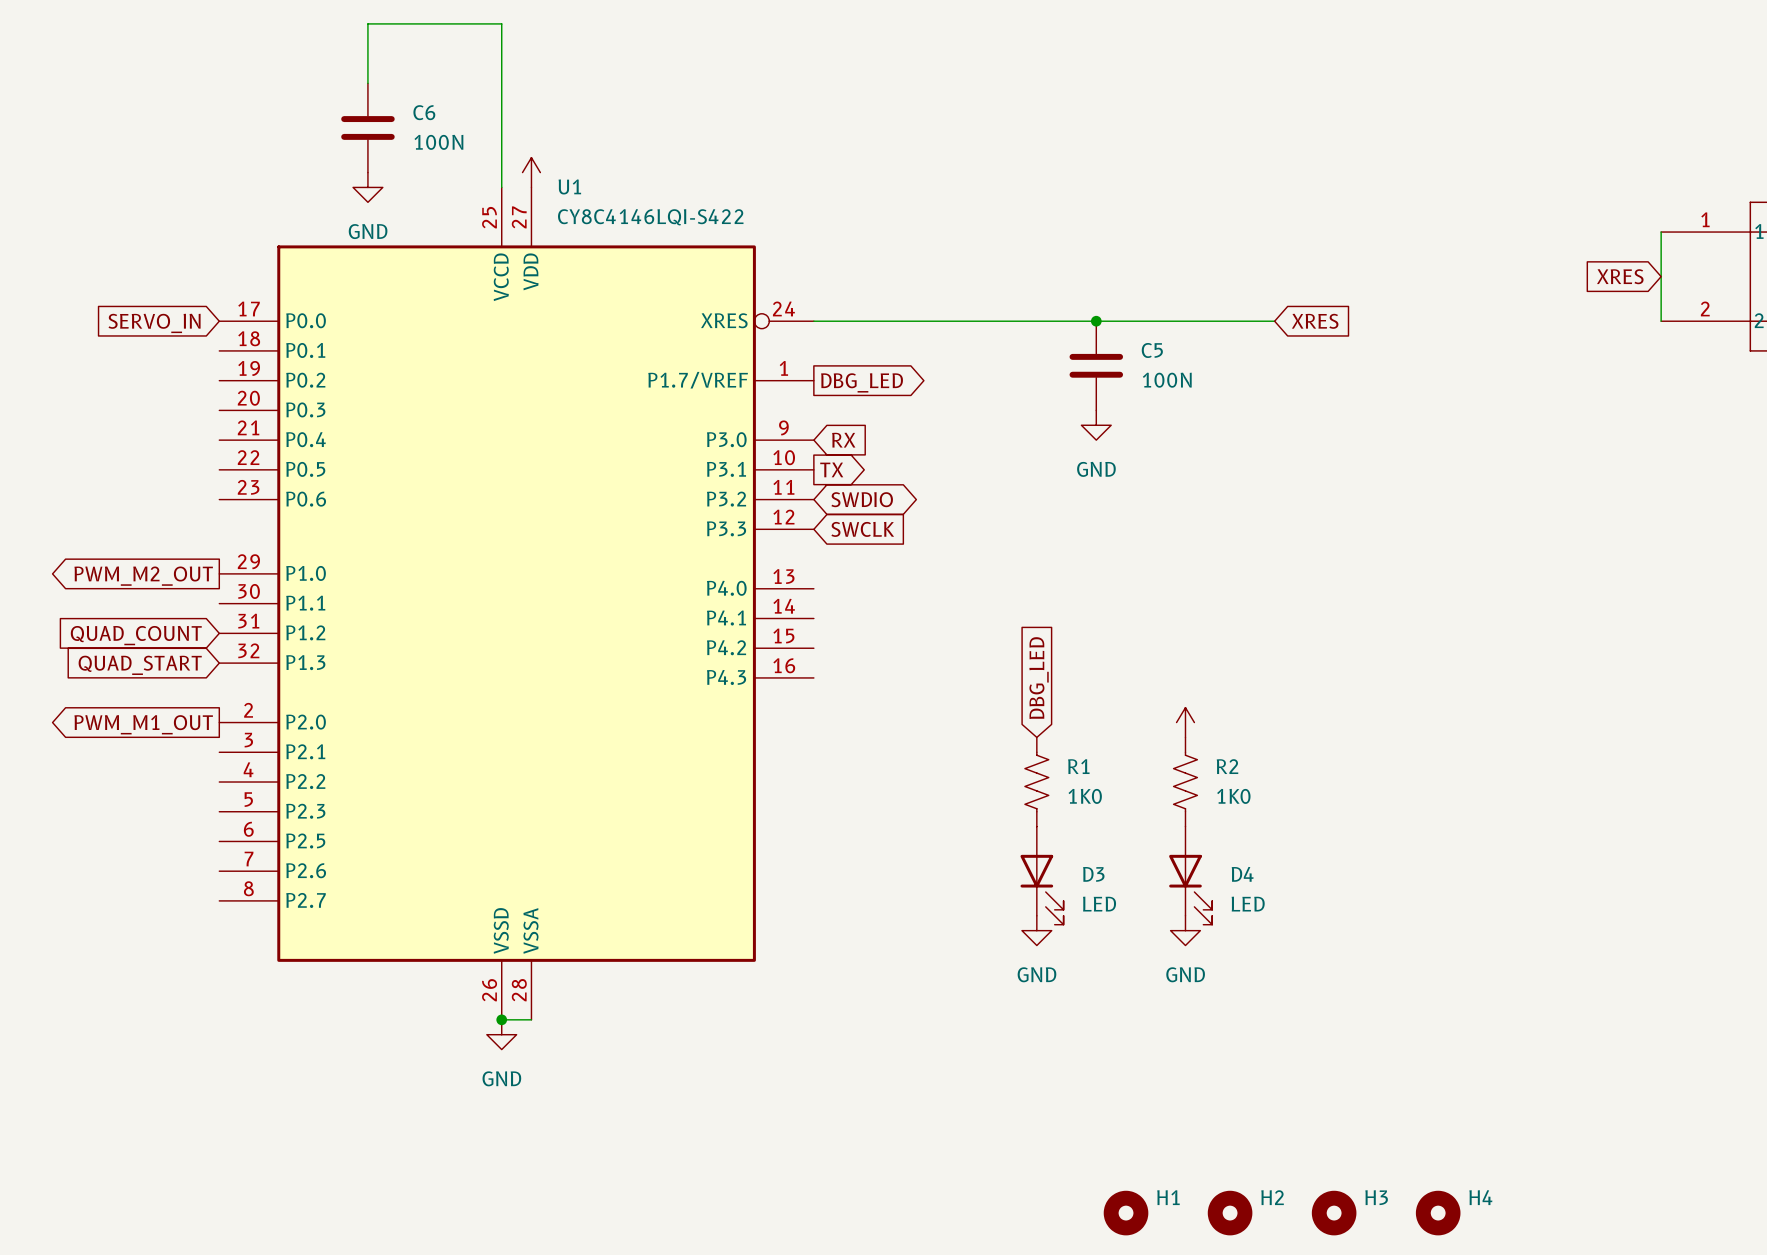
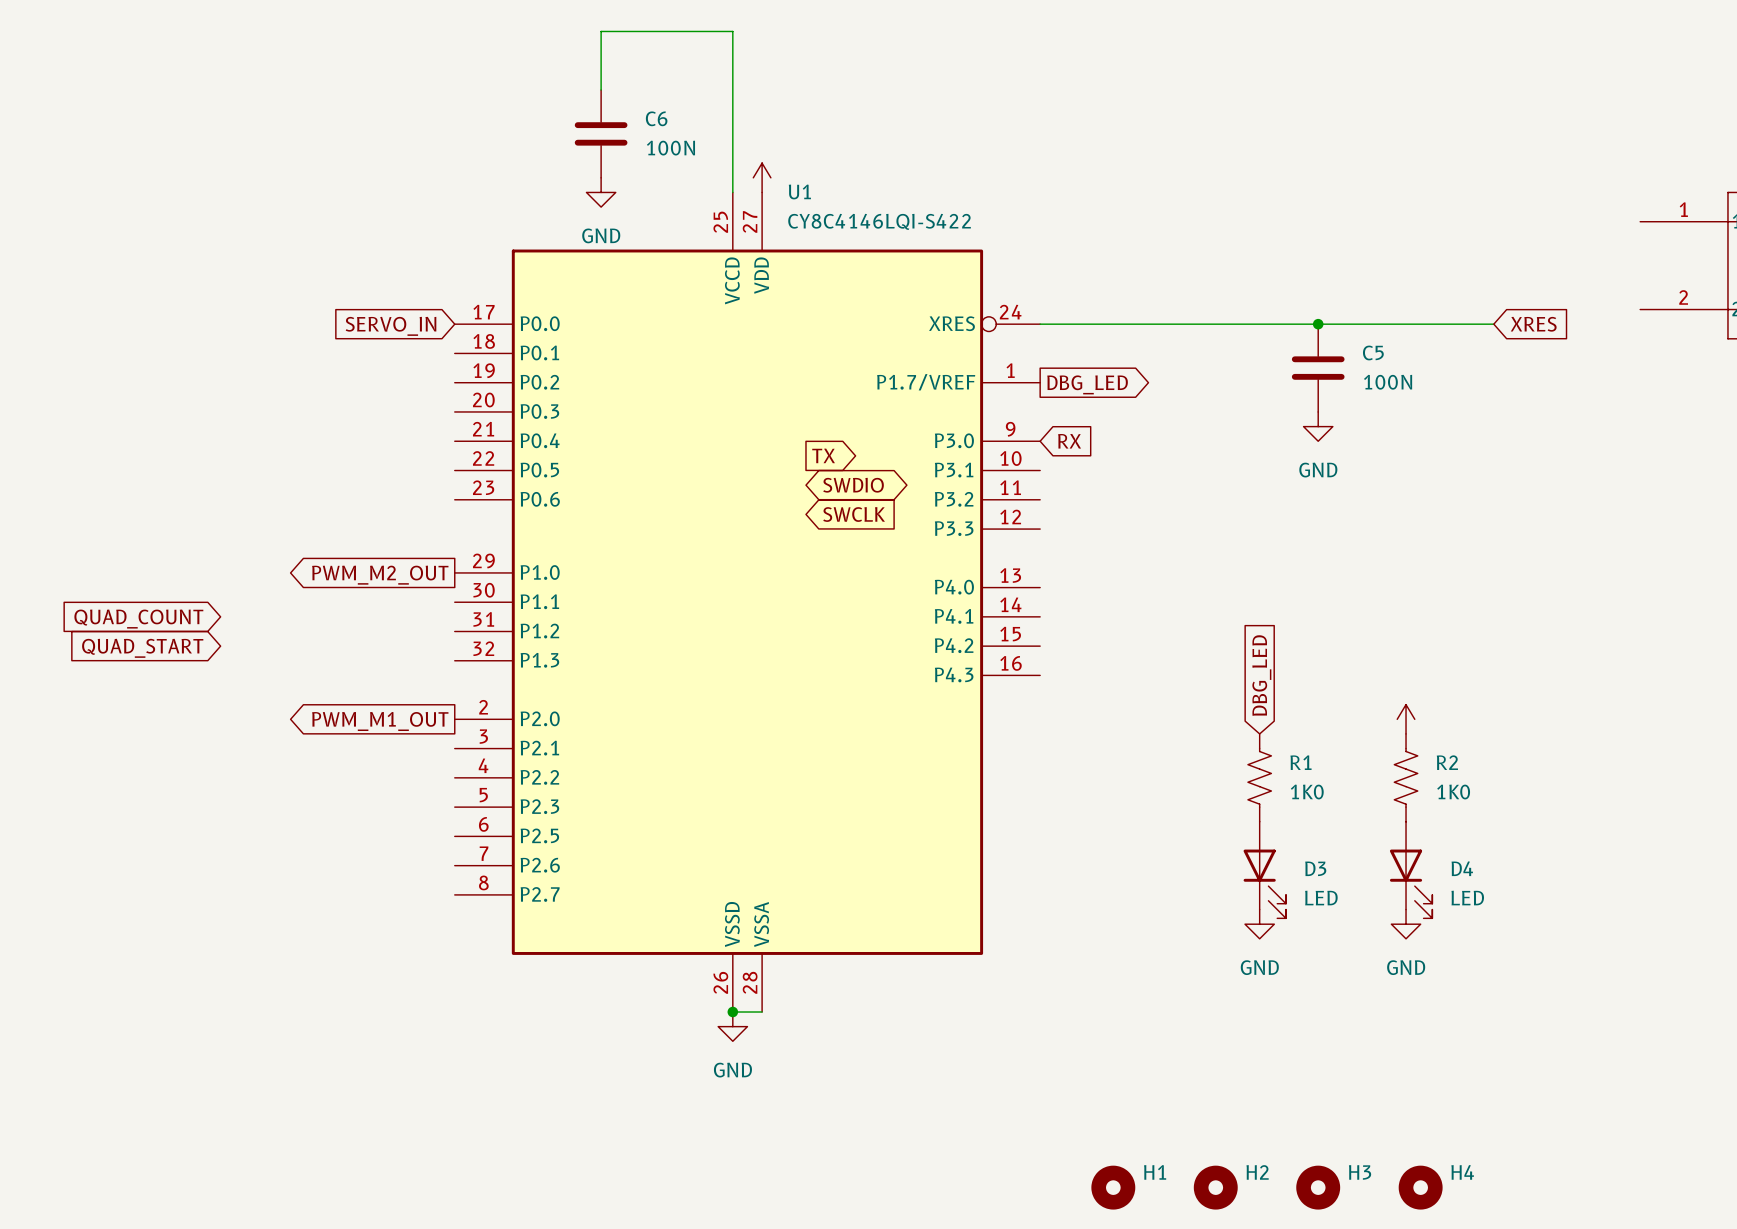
wire: (367, 83) (367, 23) (501, 23) (501, 187) -> (601, 90) (601, 31) (732, 31) (732, 192)
C6 position: (367, 127) -> (601, 133)
power symbol position: (531, 172) -> (762, 177)
power symbol position: GND (367, 187) -> GND (601, 192)
wire: (1661, 232) (1661, 321) -> none
global label: XRES (1620, 276) -> none
wire: (813, 321) (1274, 321) -> (1040, 324) (1493, 324)
junction: (1096, 321) -> none
global label: XRES (1315, 321) -> none
global label position: SERVO_IN (154, 323) -> SERVO_IN (391, 326)
junction: none -> (1318, 324)
global label: none -> XRES (1533, 324)
C5 position: (1096, 365) -> (1318, 368)
global label: DBG_LED (862, 382) -> none
global label: none -> DBG_LED (1087, 384)
power symbol position: GND (1096, 425) -> GND (1318, 426)
global label position: RX (843, 440) -> RX (1069, 441)
global label position: PWM_M2_OUT (143, 576) -> PWM_M2_OUT (380, 575)
U1 position: (516, 603) -> (747, 602)
global label: DBG_LED (1039, 678) -> none
global label: none -> DBG_LED (1261, 675)
power symbol position: (1185, 722) -> (1406, 719)
global label position: PWM_M1_OUT (143, 724) -> PWM_M1_OUT (380, 721)
R1 position: (1036, 782) -> (1259, 777)
R2 position: (1185, 782) -> (1406, 777)
D3 position: (1042, 875) -> (1264, 870)
D4 position: (1190, 875) -> (1411, 870)
power symbol: GND (1036, 930) -> none
power symbol position: GND (1185, 930) -> GND (1259, 924)
power symbol: none -> GND (1406, 924)
wire: (501, 1019) (531, 1019) -> (732, 1012) (762, 1012)
junction: (501, 1019) -> none
power symbol: GND (501, 1034) -> none
junction: none -> (732, 1012)
power symbol: none -> GND (732, 1026)

